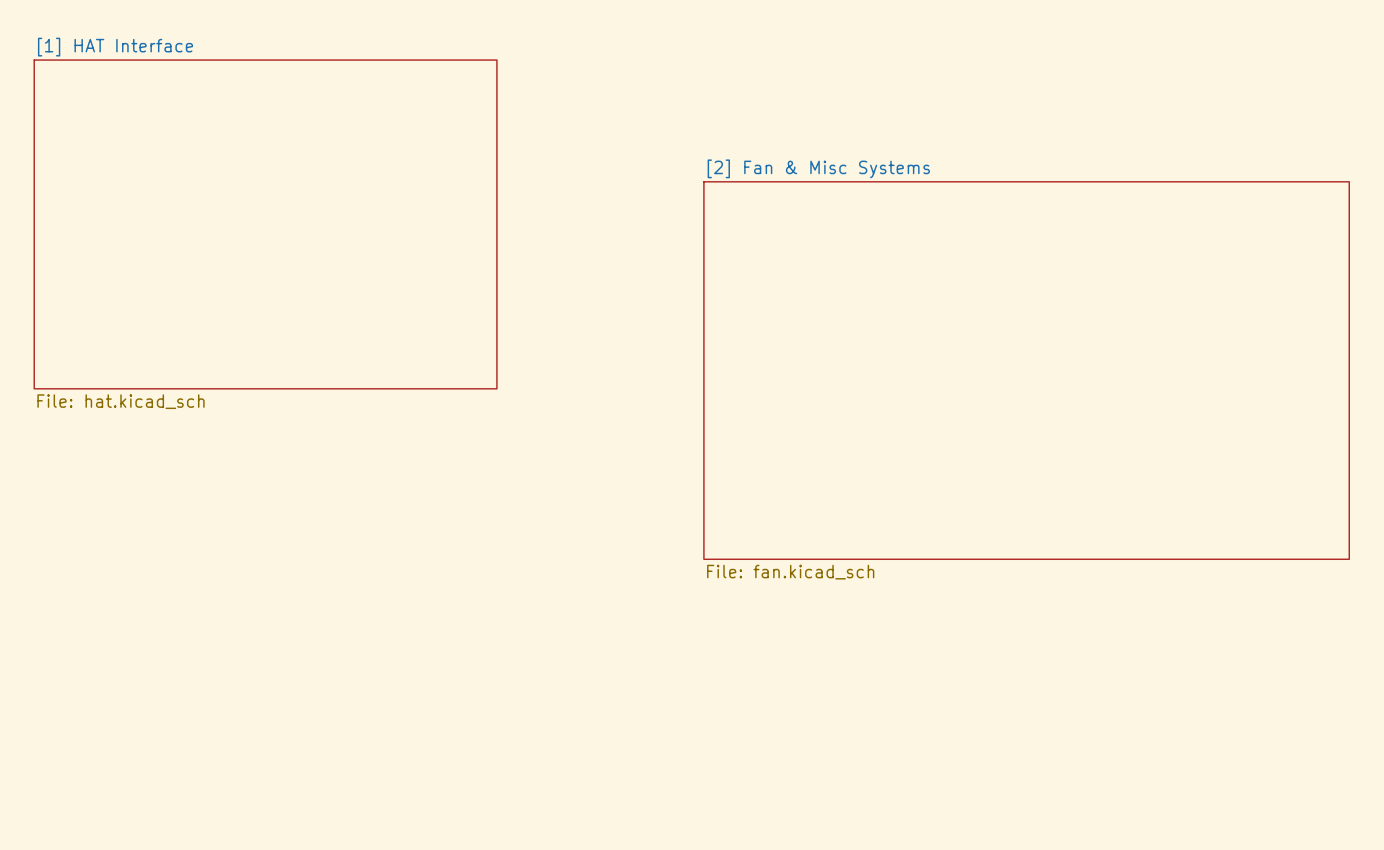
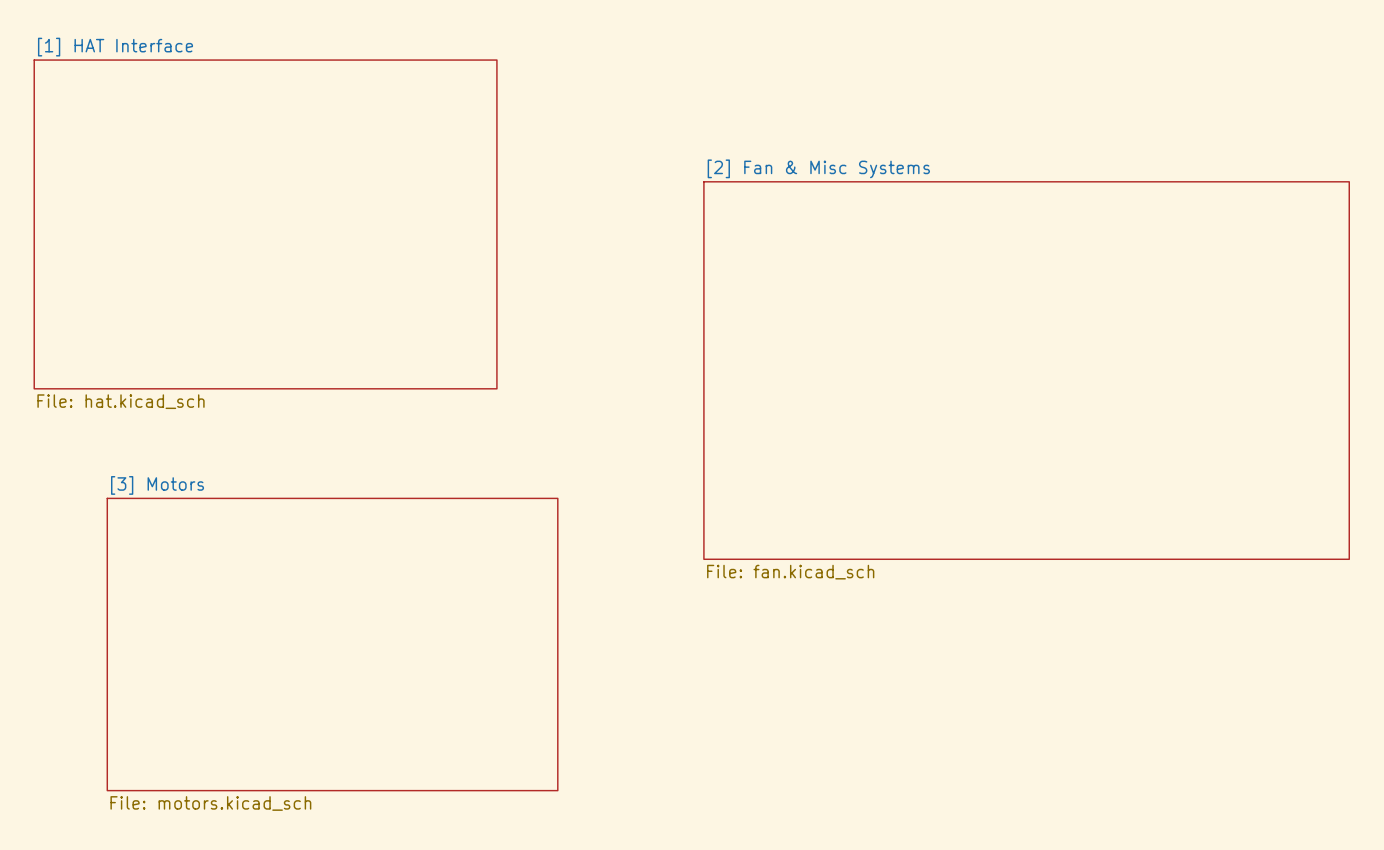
sheet [3] Motors: none -> File: motors.kicad_sch (332, 644)

